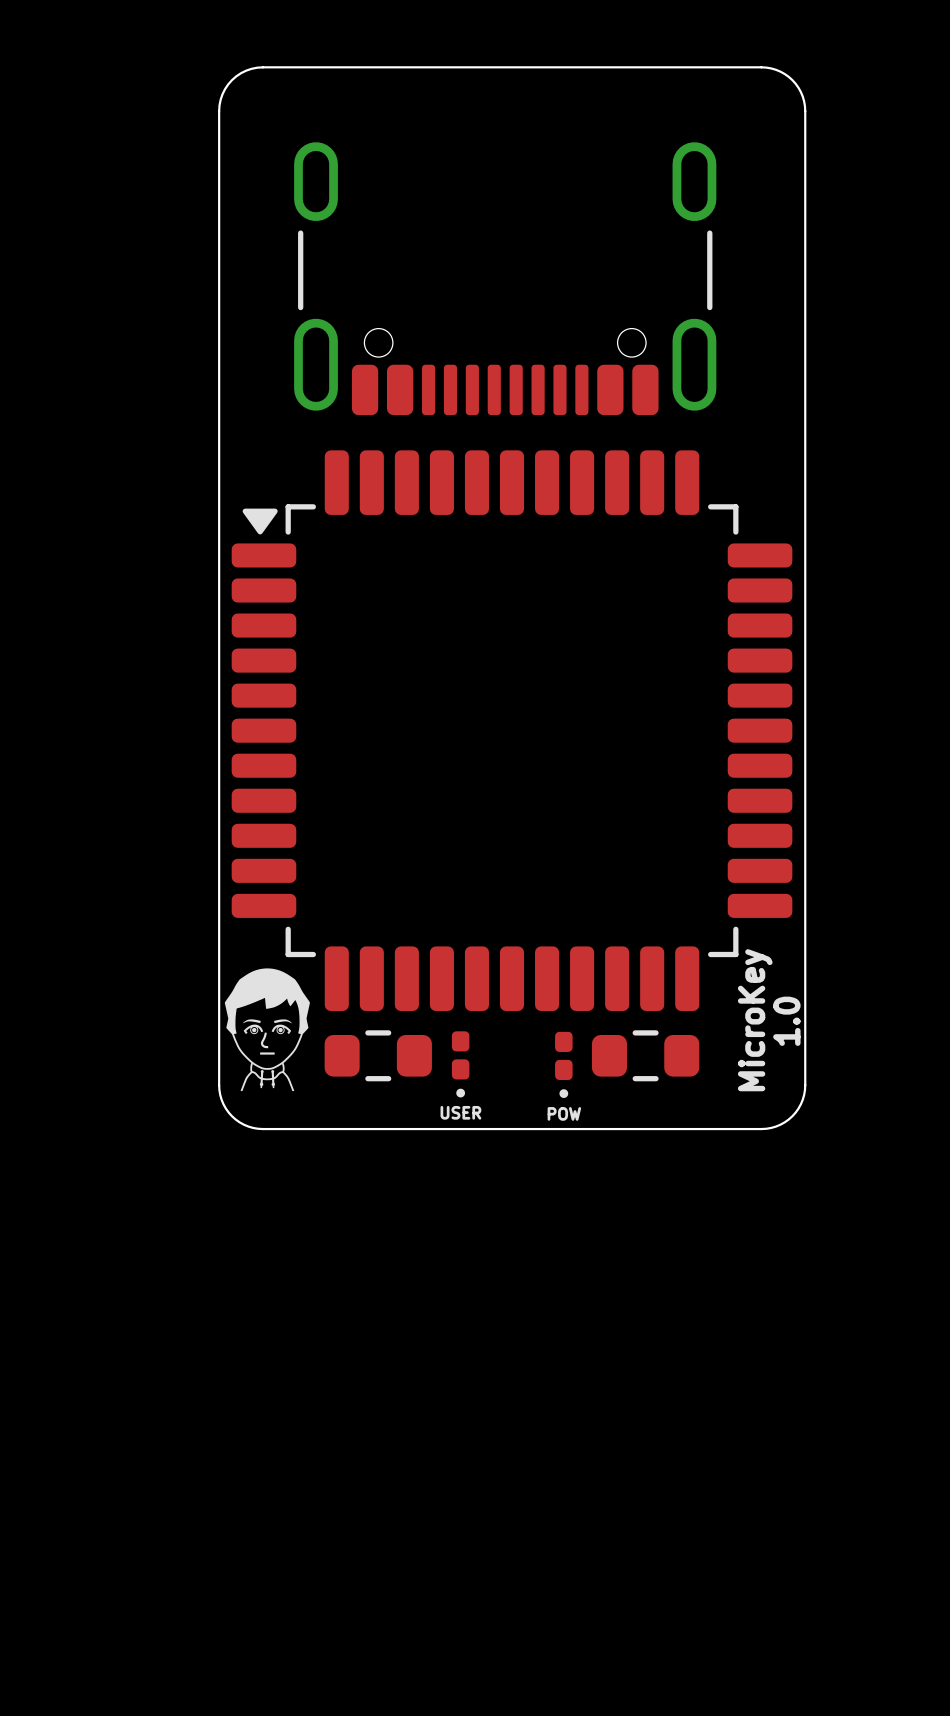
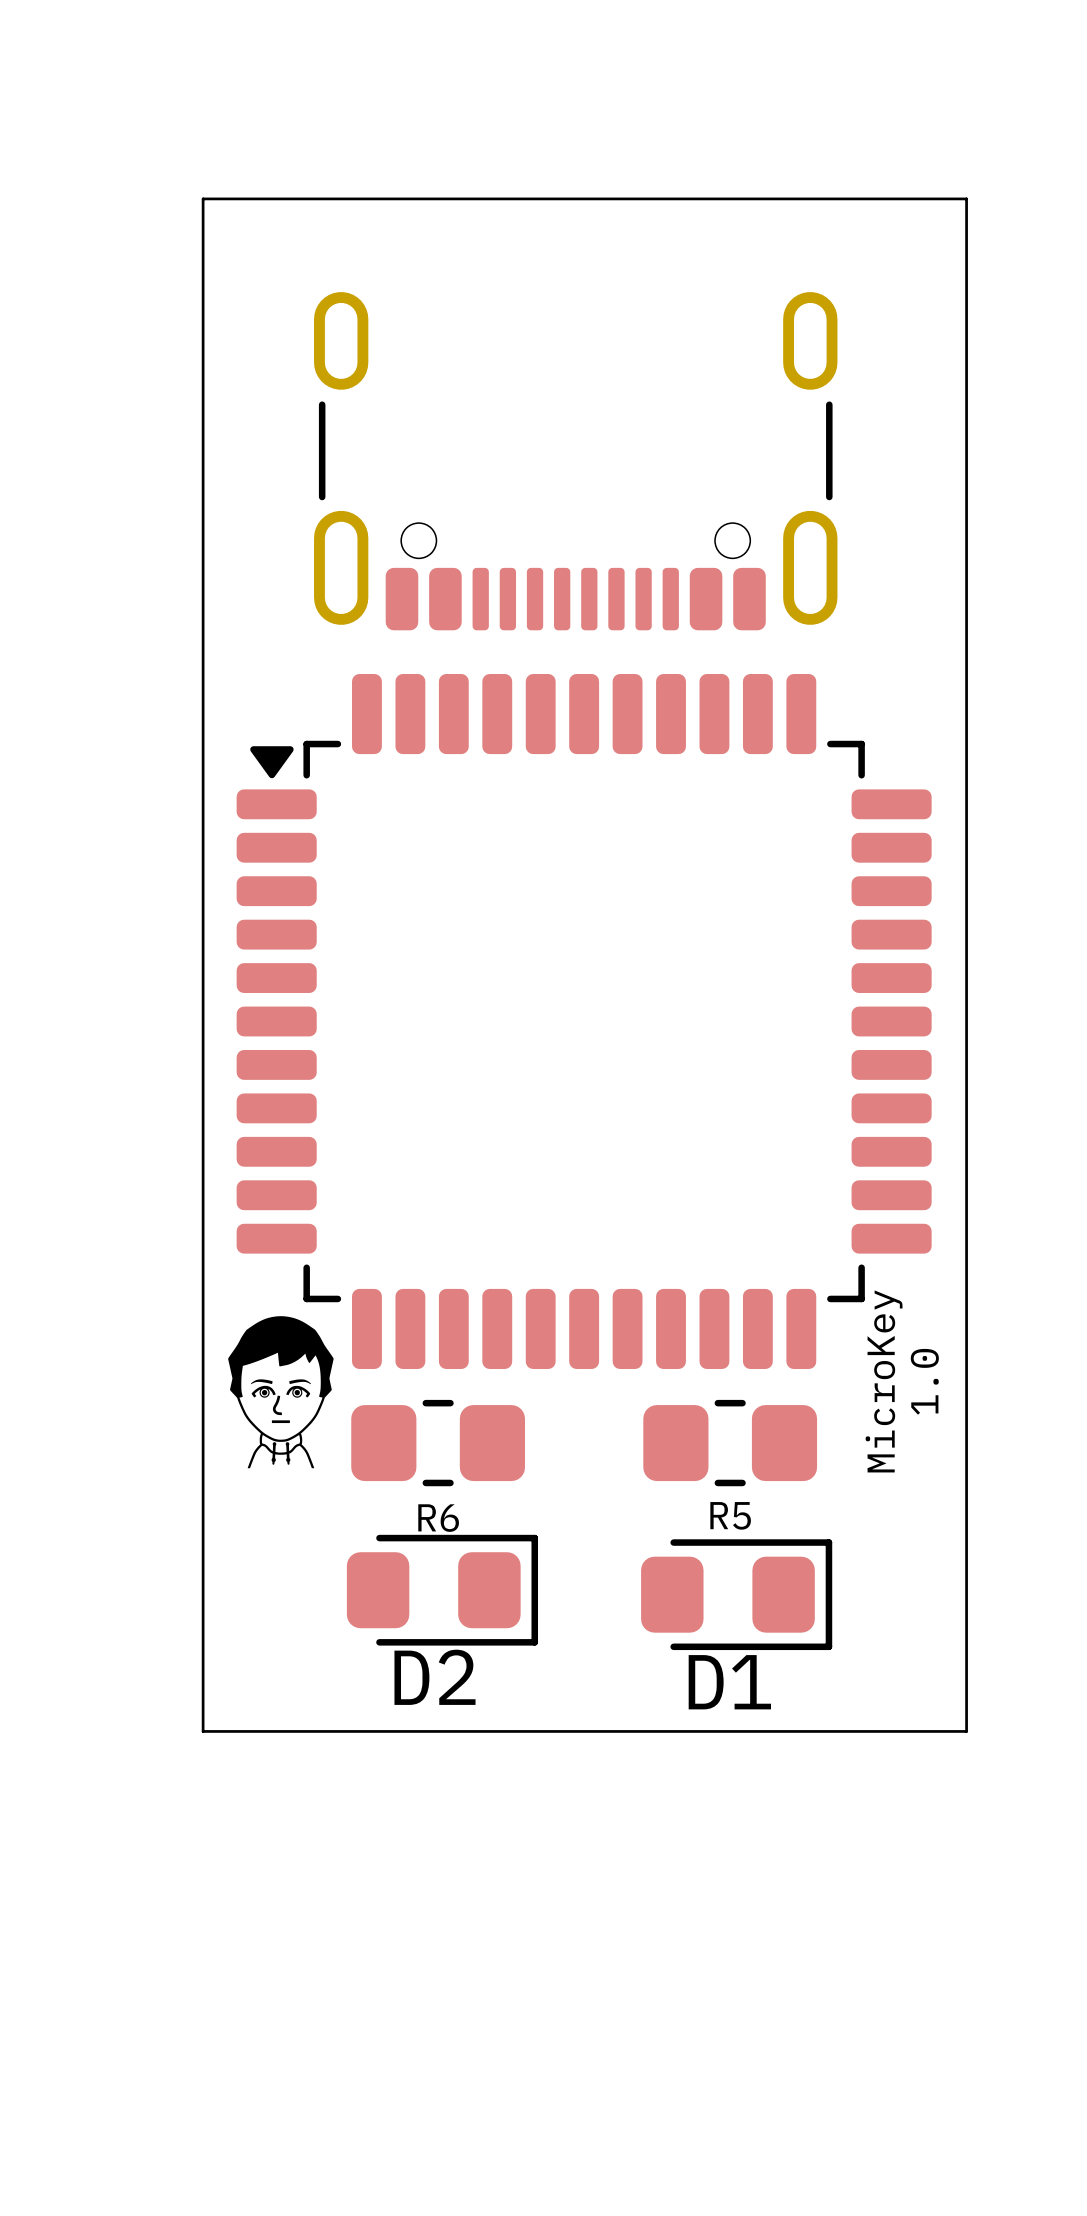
board edge: (262, 67) (761, 67) (771, 68) (784, 74) (795, 83) (800, 92) (805, 111) (805, 1085) (802, 1099) (798, 1108) (788, 1119) (780, 1124) (761, 1129) (262, 1129) (248, 1126) (239, 1122) (228, 1112) (223, 1104) (219, 1085) (219, 111) (222, 94) (231, 80) (246, 70) (262, 67) -> (203, 198) (203, 1731) (966, 1731) (966, 198) (203, 198)
part: (378, 1055) -> none
part: (645, 1055) -> none
USER: (460, 1064) -> none
POW: (563, 1064) -> none
R6: none -> (438, 1443)
R5: none -> (730, 1443)
D2: none -> (442, 1590)
D1: none -> (736, 1594)

